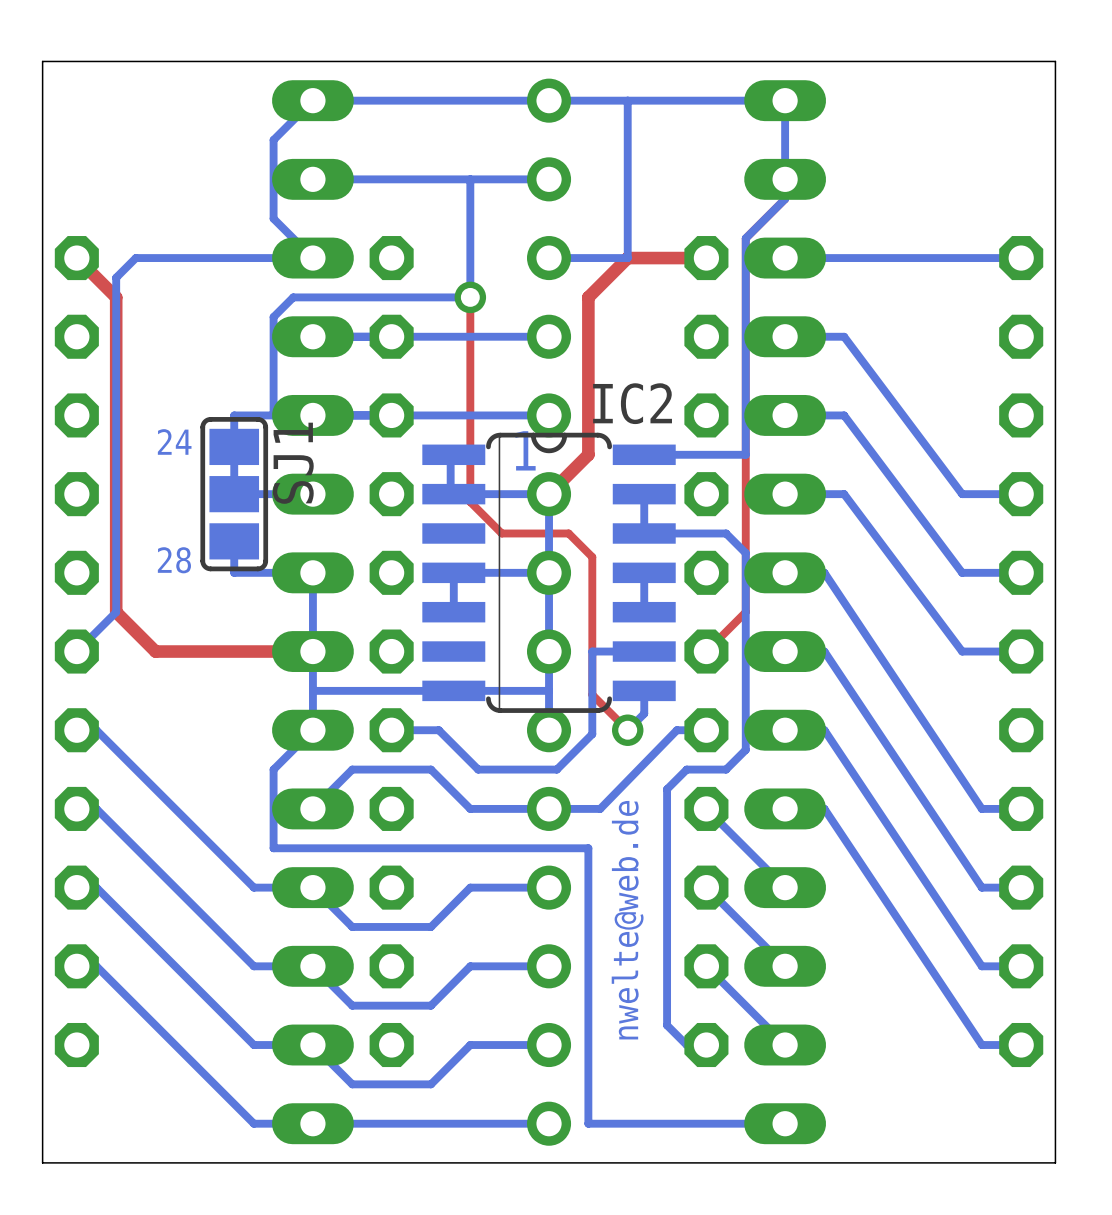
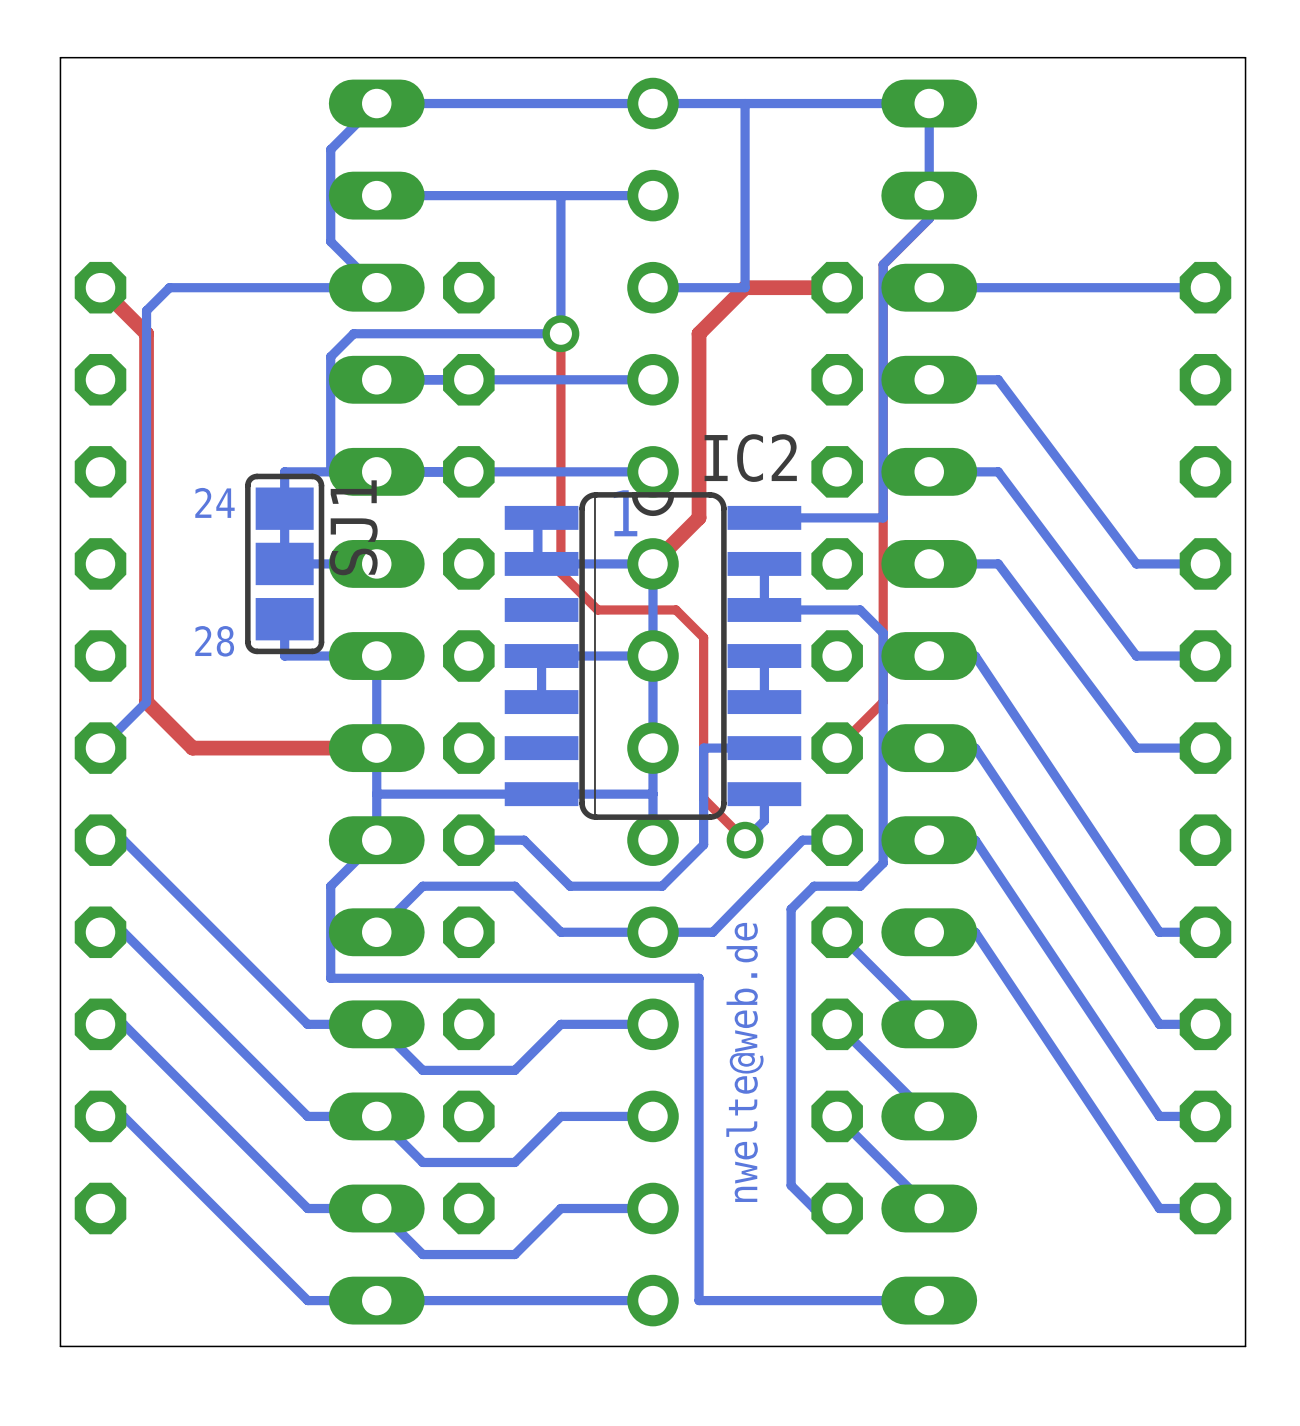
IC2 footprint: [422, 432, 676, 713] -> [504, 492, 802, 820]

